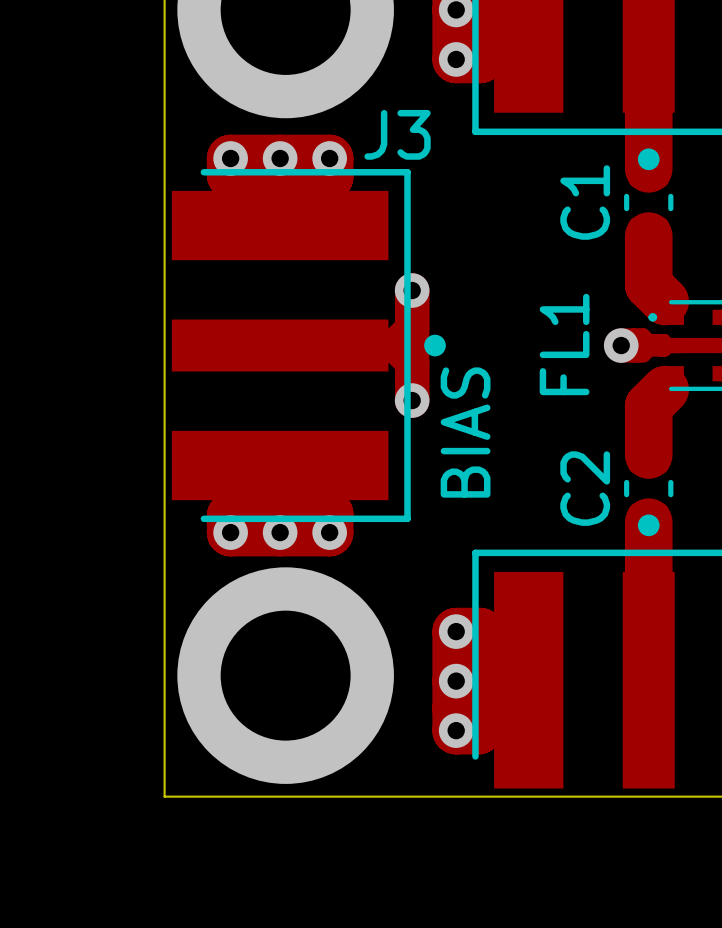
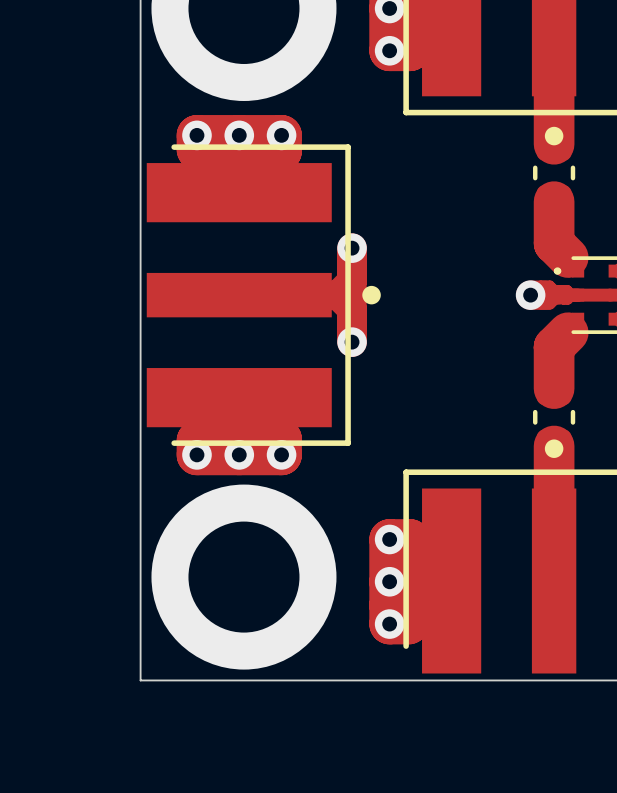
J3 name: J3 (397, 134) -> none
C1 name: C1 (585, 202) -> none
FL1 name: FL1 (564, 344) -> none
text: BIAS (465, 432) -> none
C2 name: C2 (585, 488) -> none

